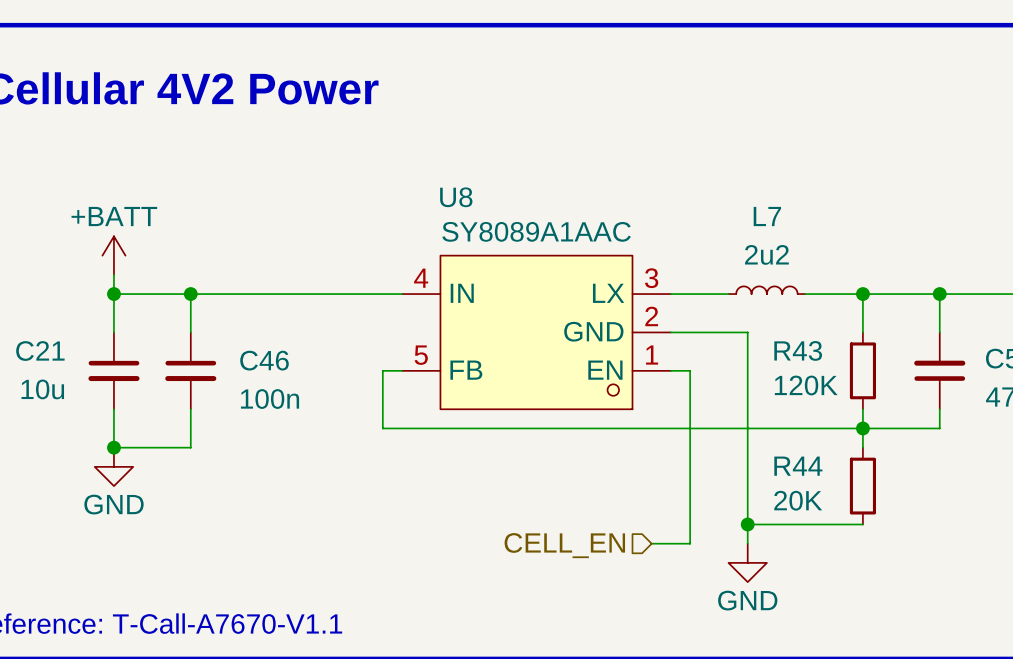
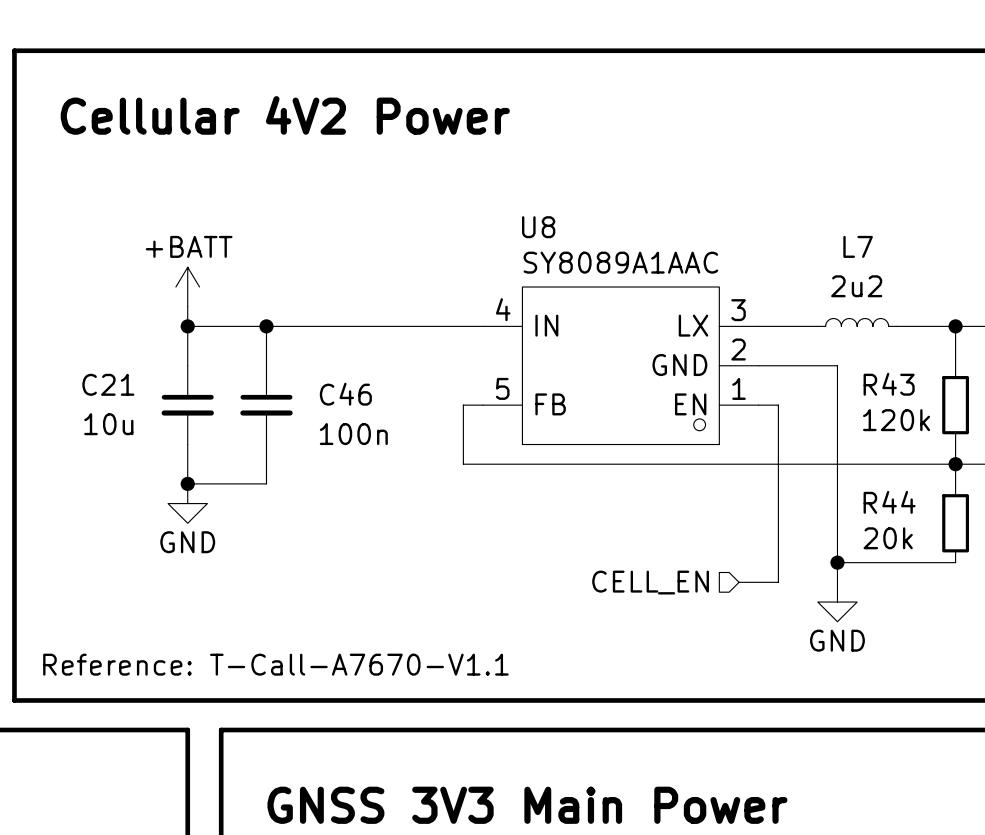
R43 value: 120K (806, 385) -> 120k (896, 420)
R44 value: 20K (798, 500) -> 20k (888, 538)

